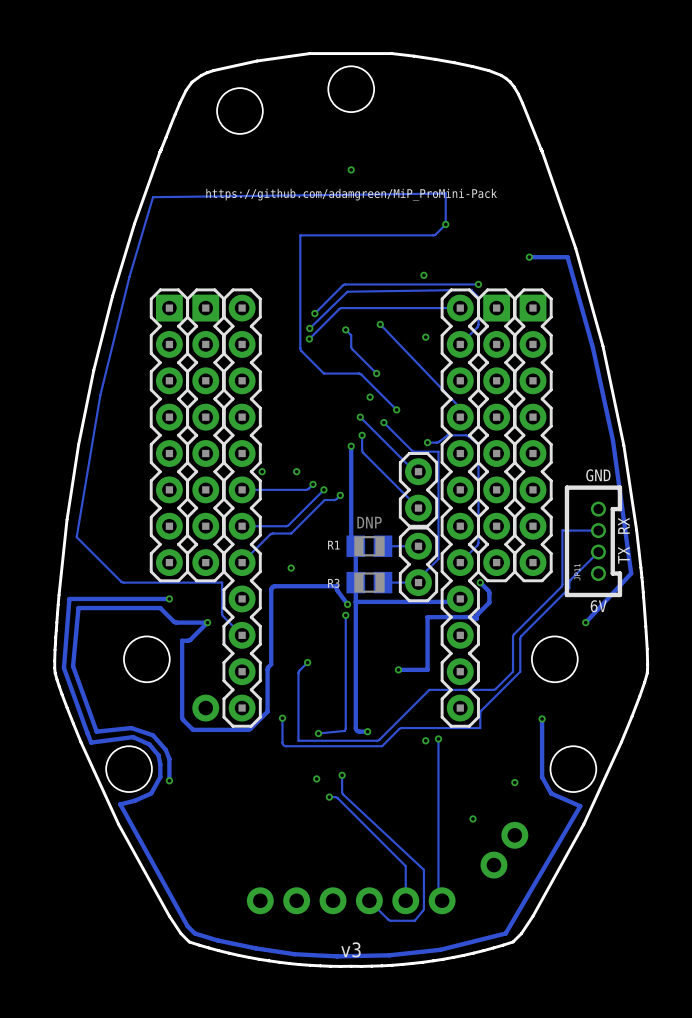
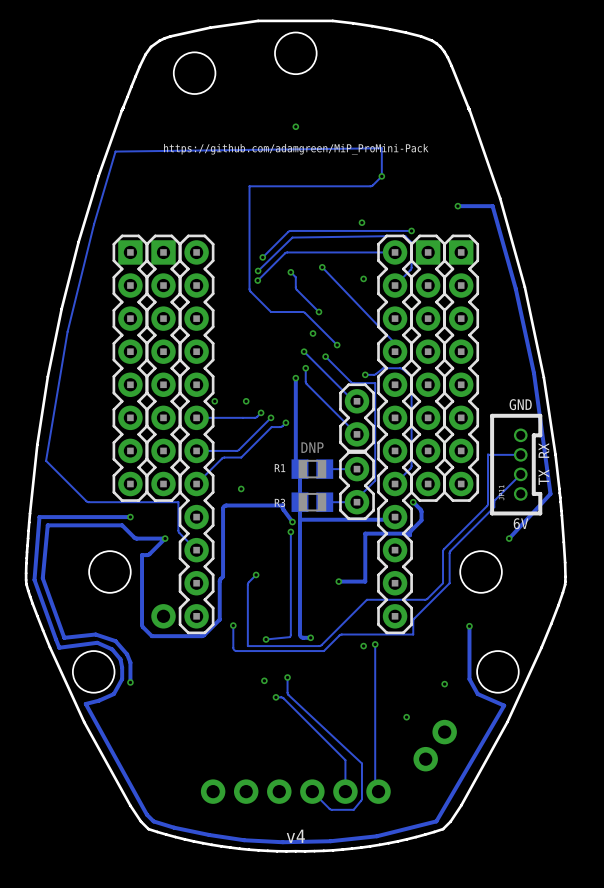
text: v3 (350, 949) -> v4 (295, 836)

